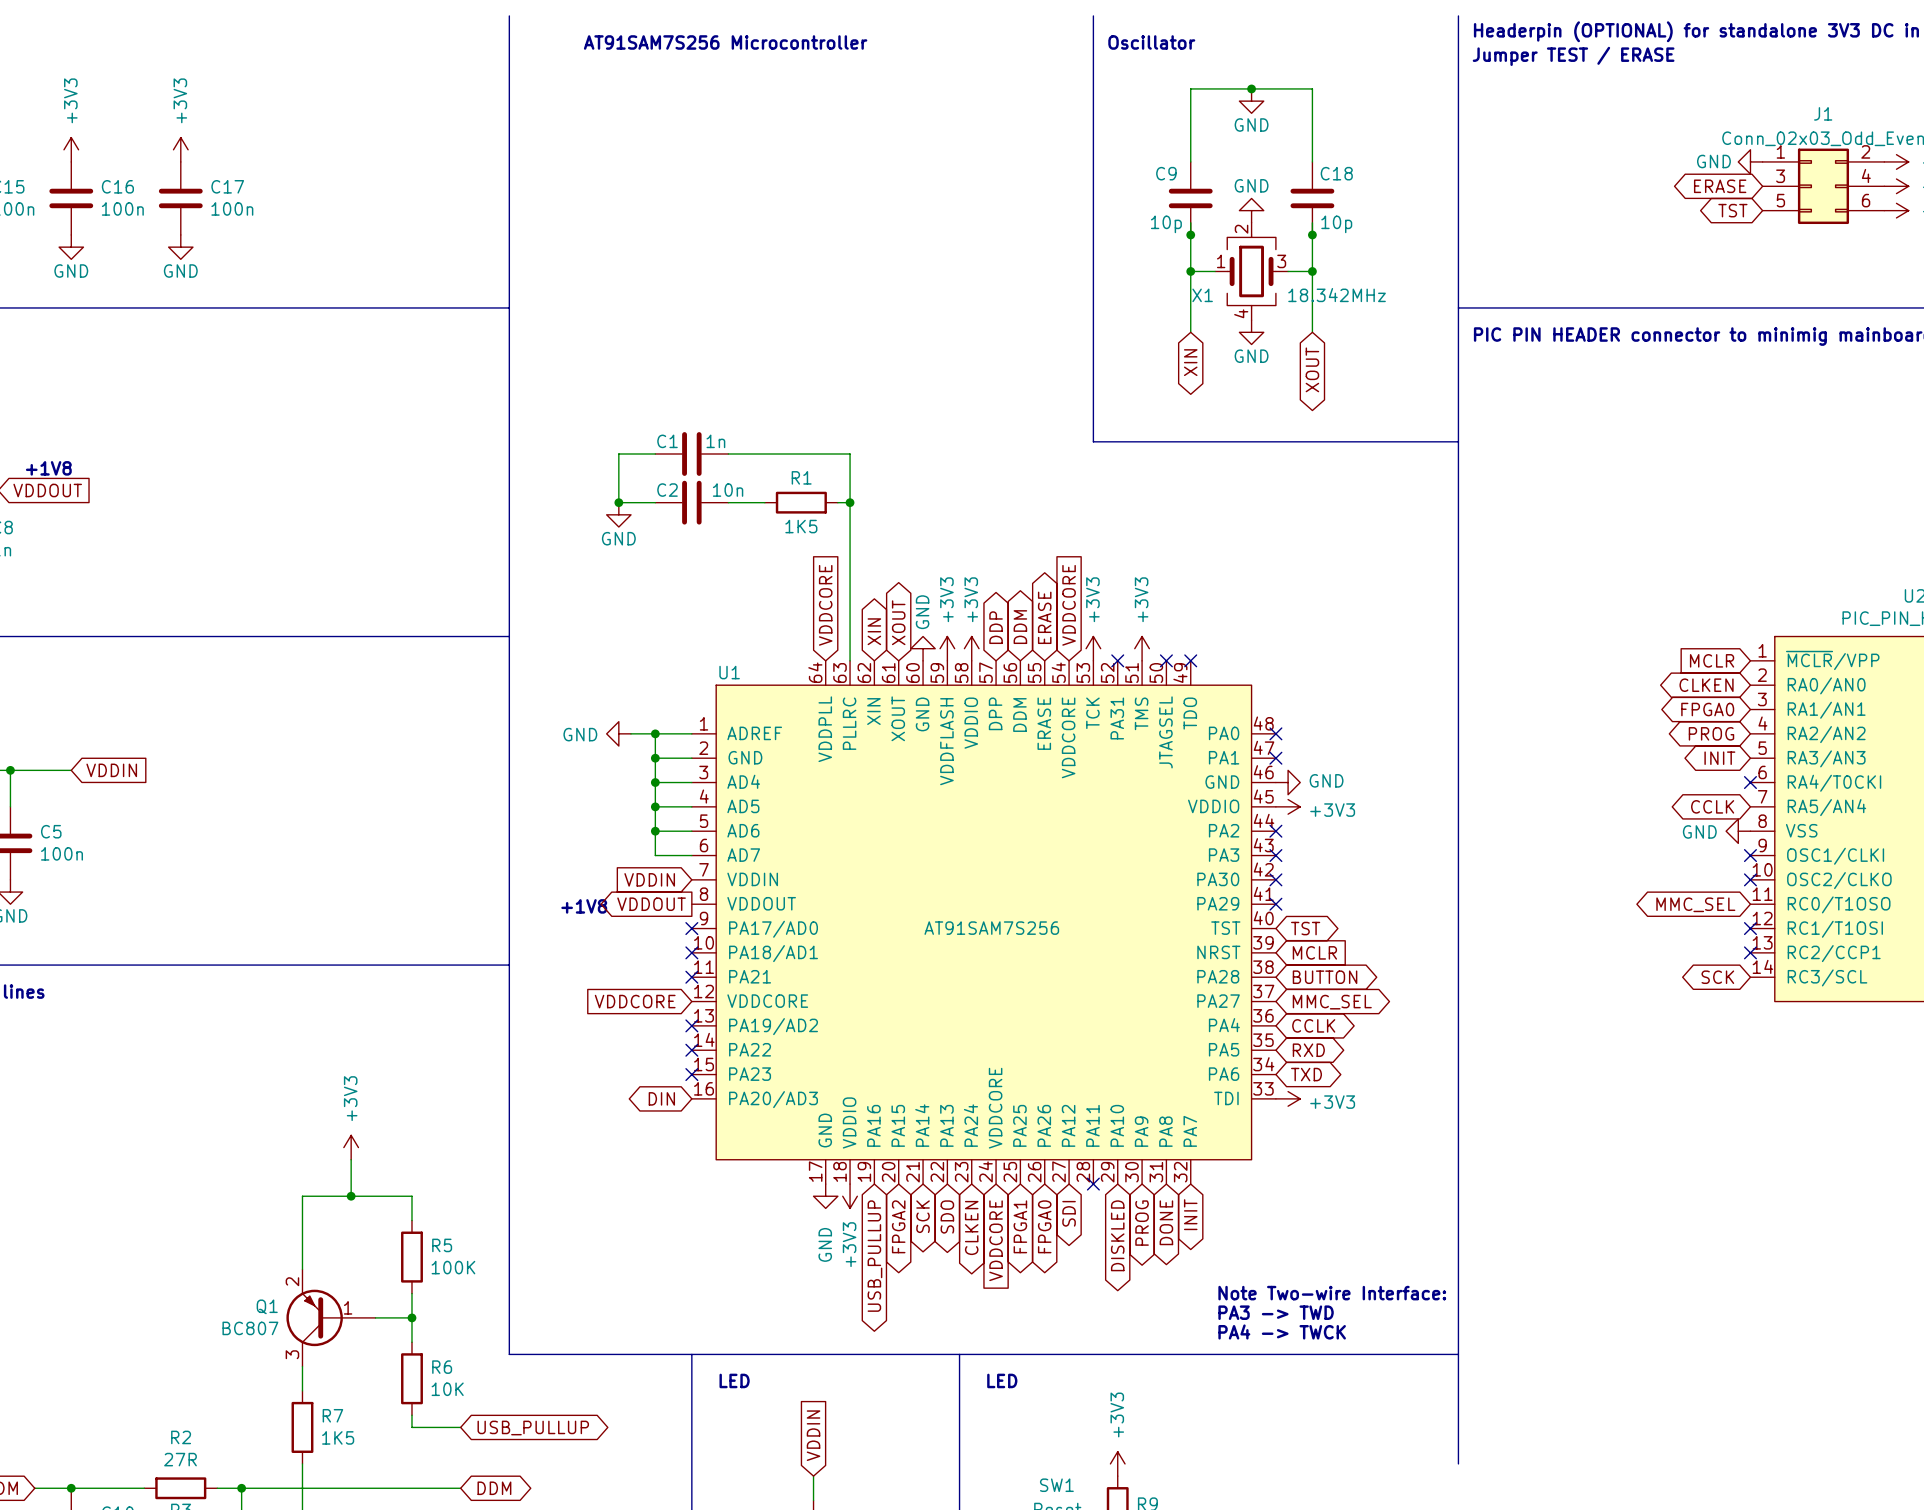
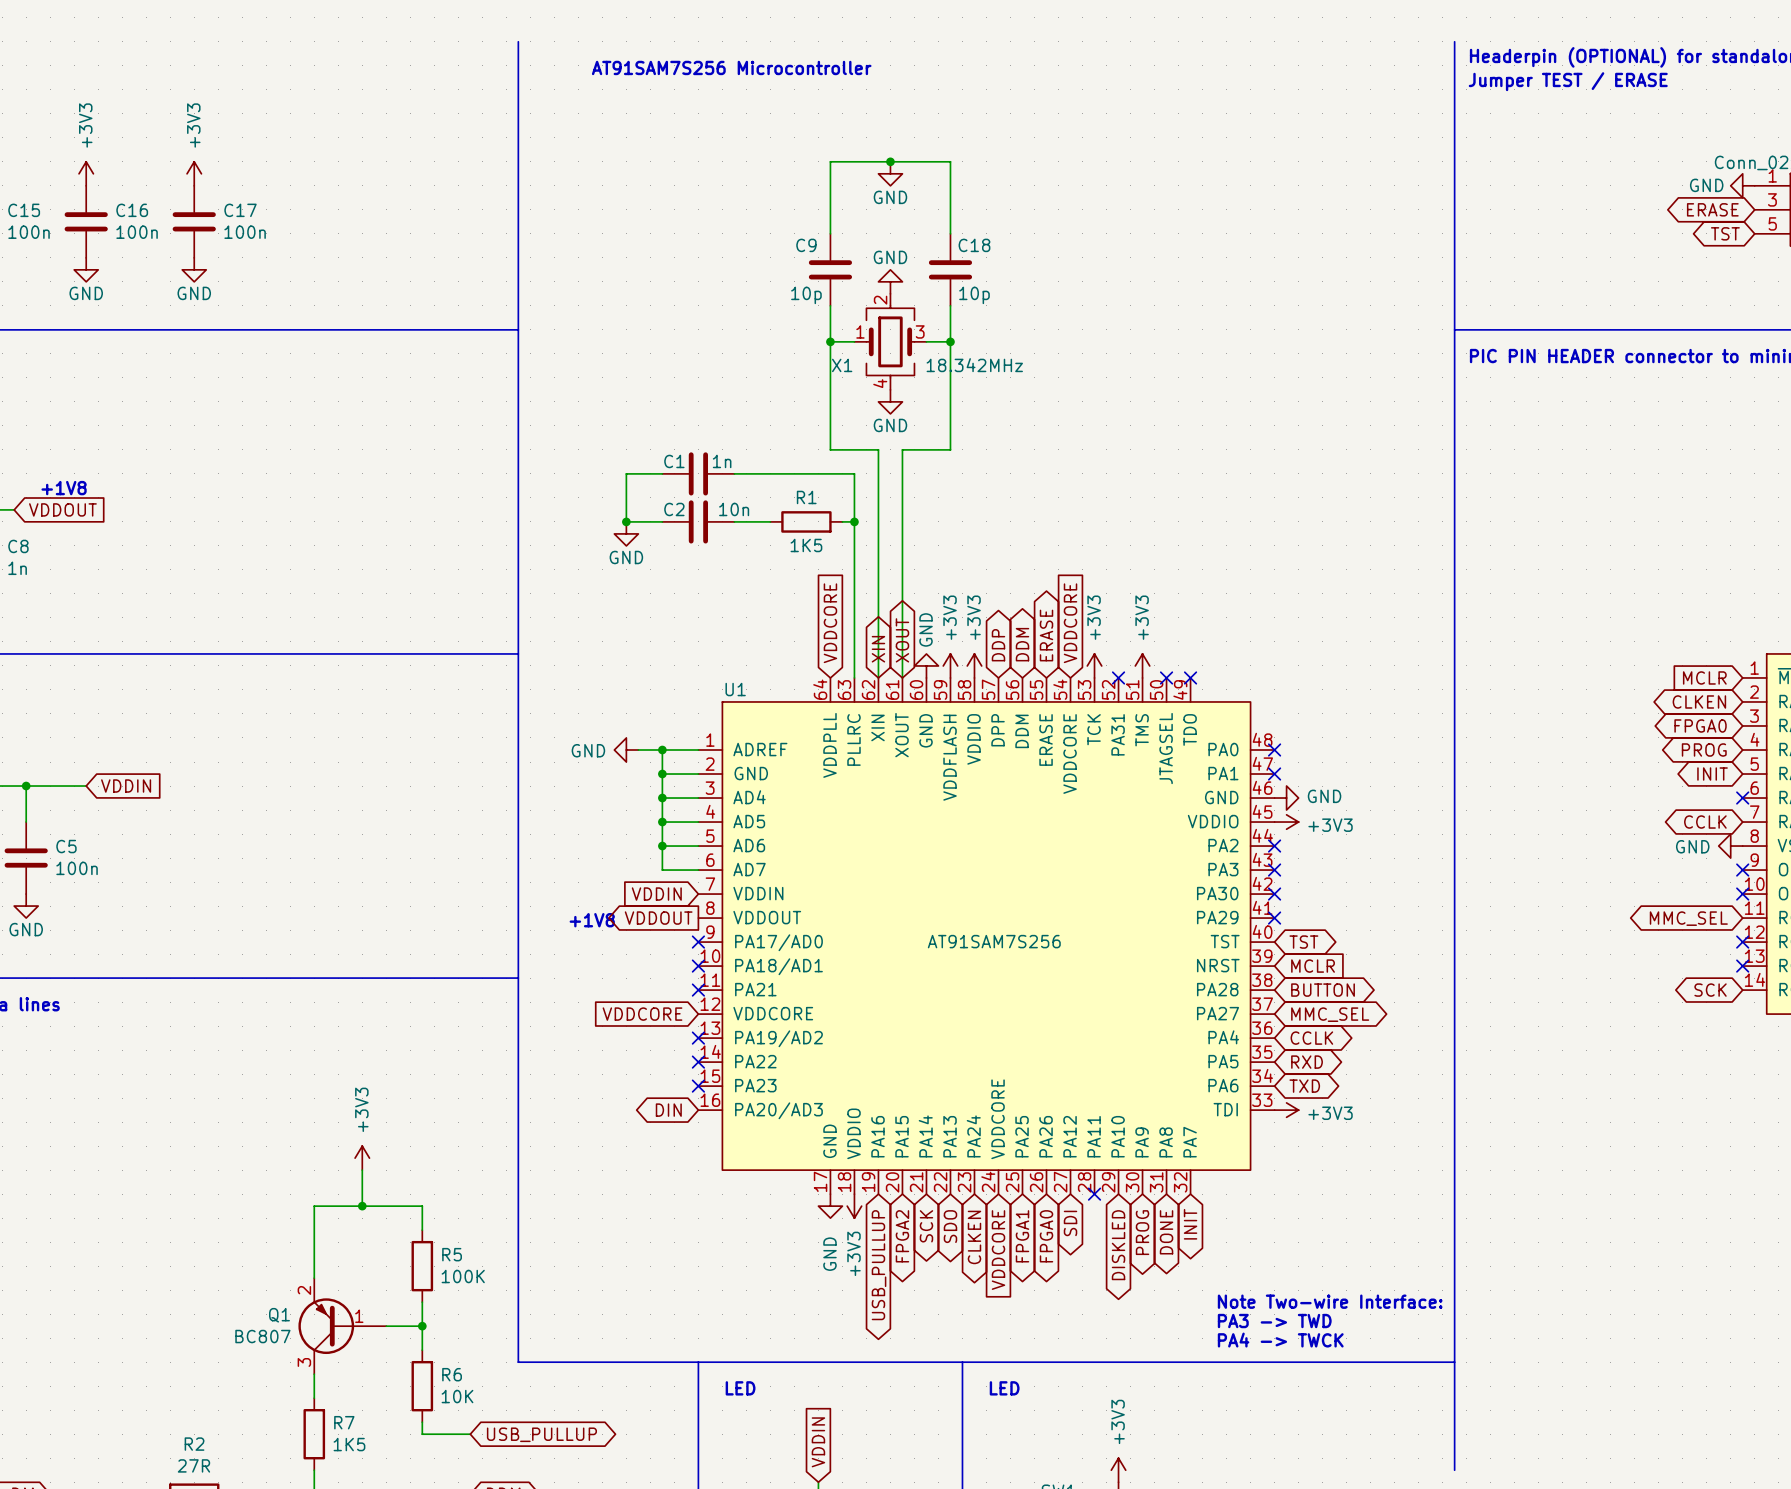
line: (1093, 15) (1093, 441) (1458, 441) -> none
text: Oscillator (1151, 42) -> none
junction: (1251, 88) -> none
power symbol: GND (1251, 101) -> none
junction: none -> (890, 161)
power symbol: none -> GND (890, 173)
wire: (1190, 161) (1190, 88) (1312, 88) (1312, 161) -> none
C9 position: (1190, 198) -> (830, 269)
C18 position: (1312, 198) -> (950, 269)
wire: none -> (830, 233) (830, 161) (950, 161) (950, 233)
power symbol: GND (1251, 210) -> none
wire: (1190, 222) (1190, 332) -> none
wire: (1312, 222) (1312, 332) -> none
junction: (1190, 234) -> none
junction: (1312, 234) -> none
power symbol: none -> GND (890, 281)
wire: (1190, 271) (1215, 271) -> none
junction: (1190, 271) -> none
X1 position: (1251, 271) -> (890, 341)
wire: (1288, 271) (1312, 271) -> none
junction: (1312, 271) -> none
wire: none -> (830, 305) (830, 449) (878, 449) (878, 677)
wire: none -> (950, 305) (950, 449) (902, 449) (902, 677)
wire: none -> (830, 341) (854, 341)
junction: none -> (830, 341)
wire: none -> (926, 341) (950, 341)
junction: none -> (950, 341)
power symbol: GND (1251, 332) -> none
global label: XIN (1190, 362) -> none
global label: XOUT (1312, 369) -> none
power symbol: none -> GND (890, 401)

